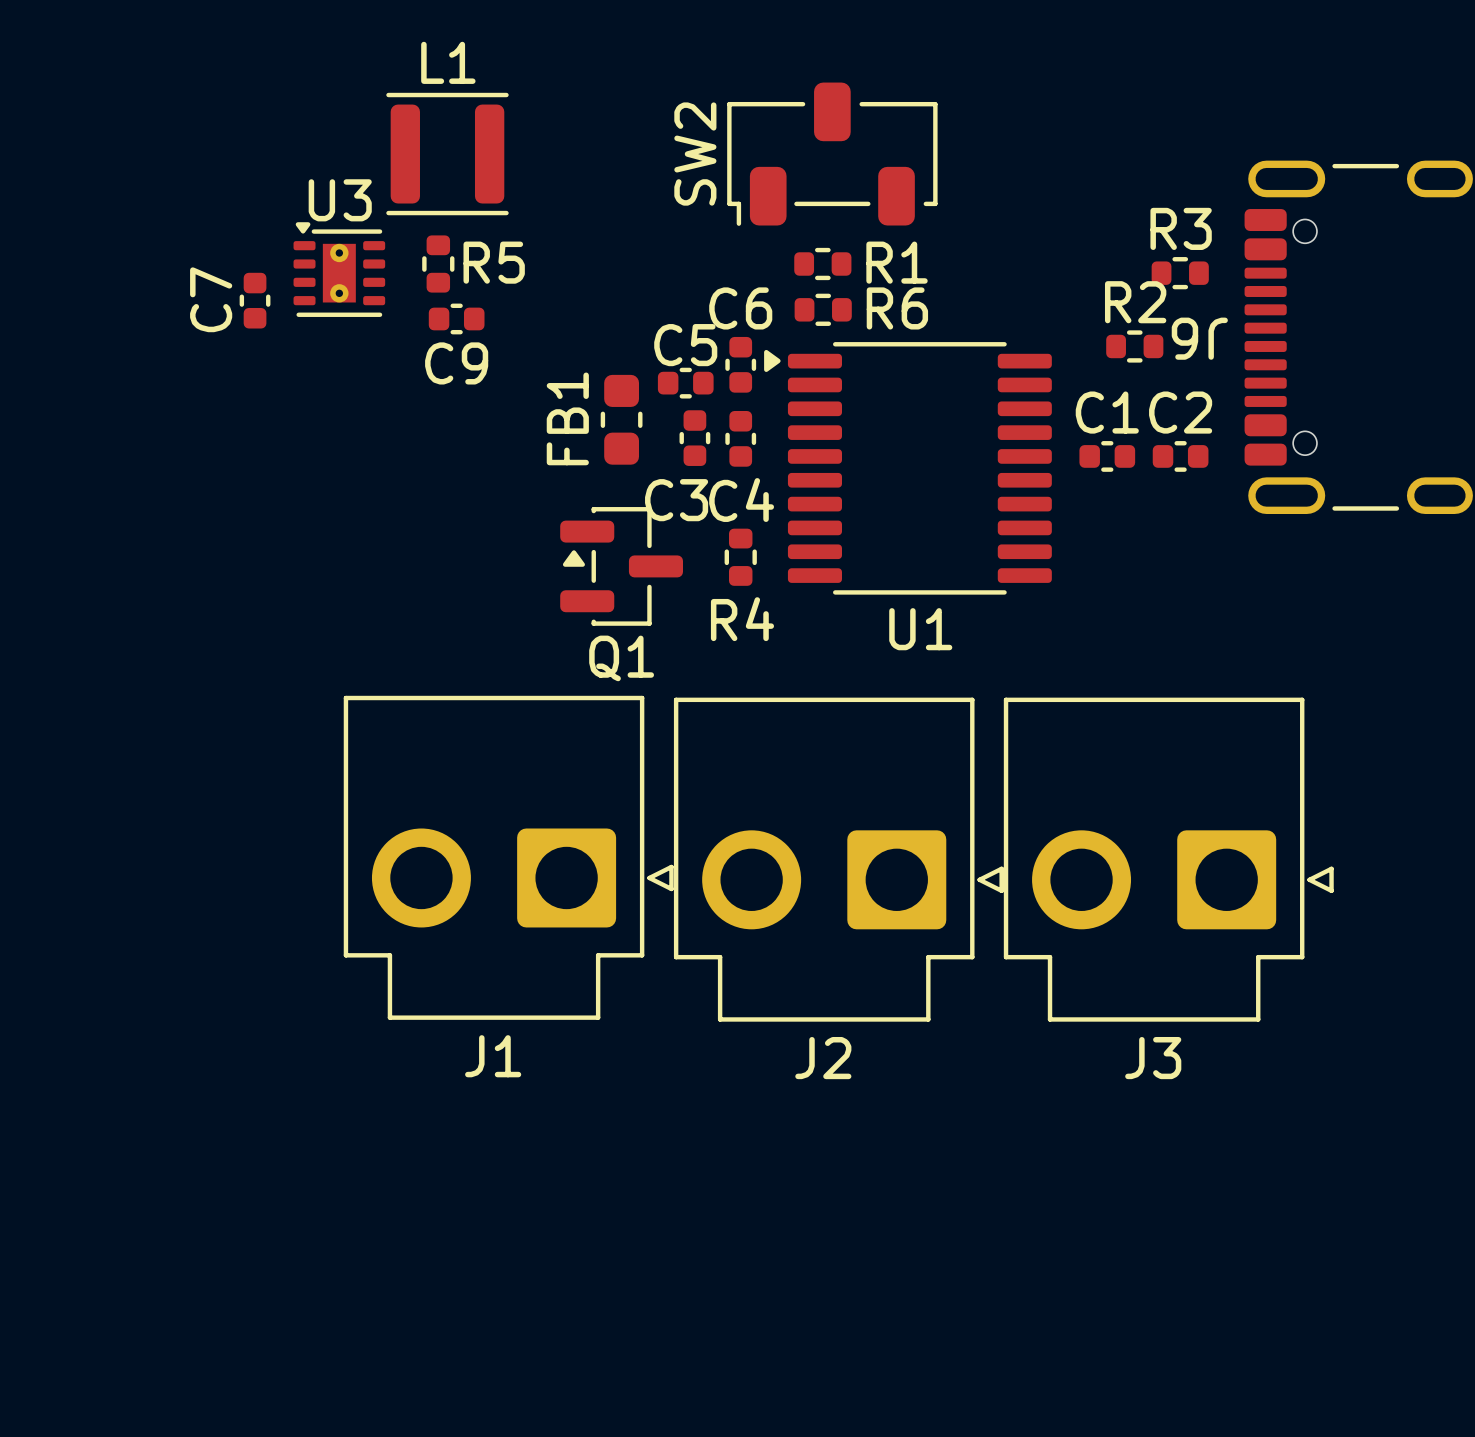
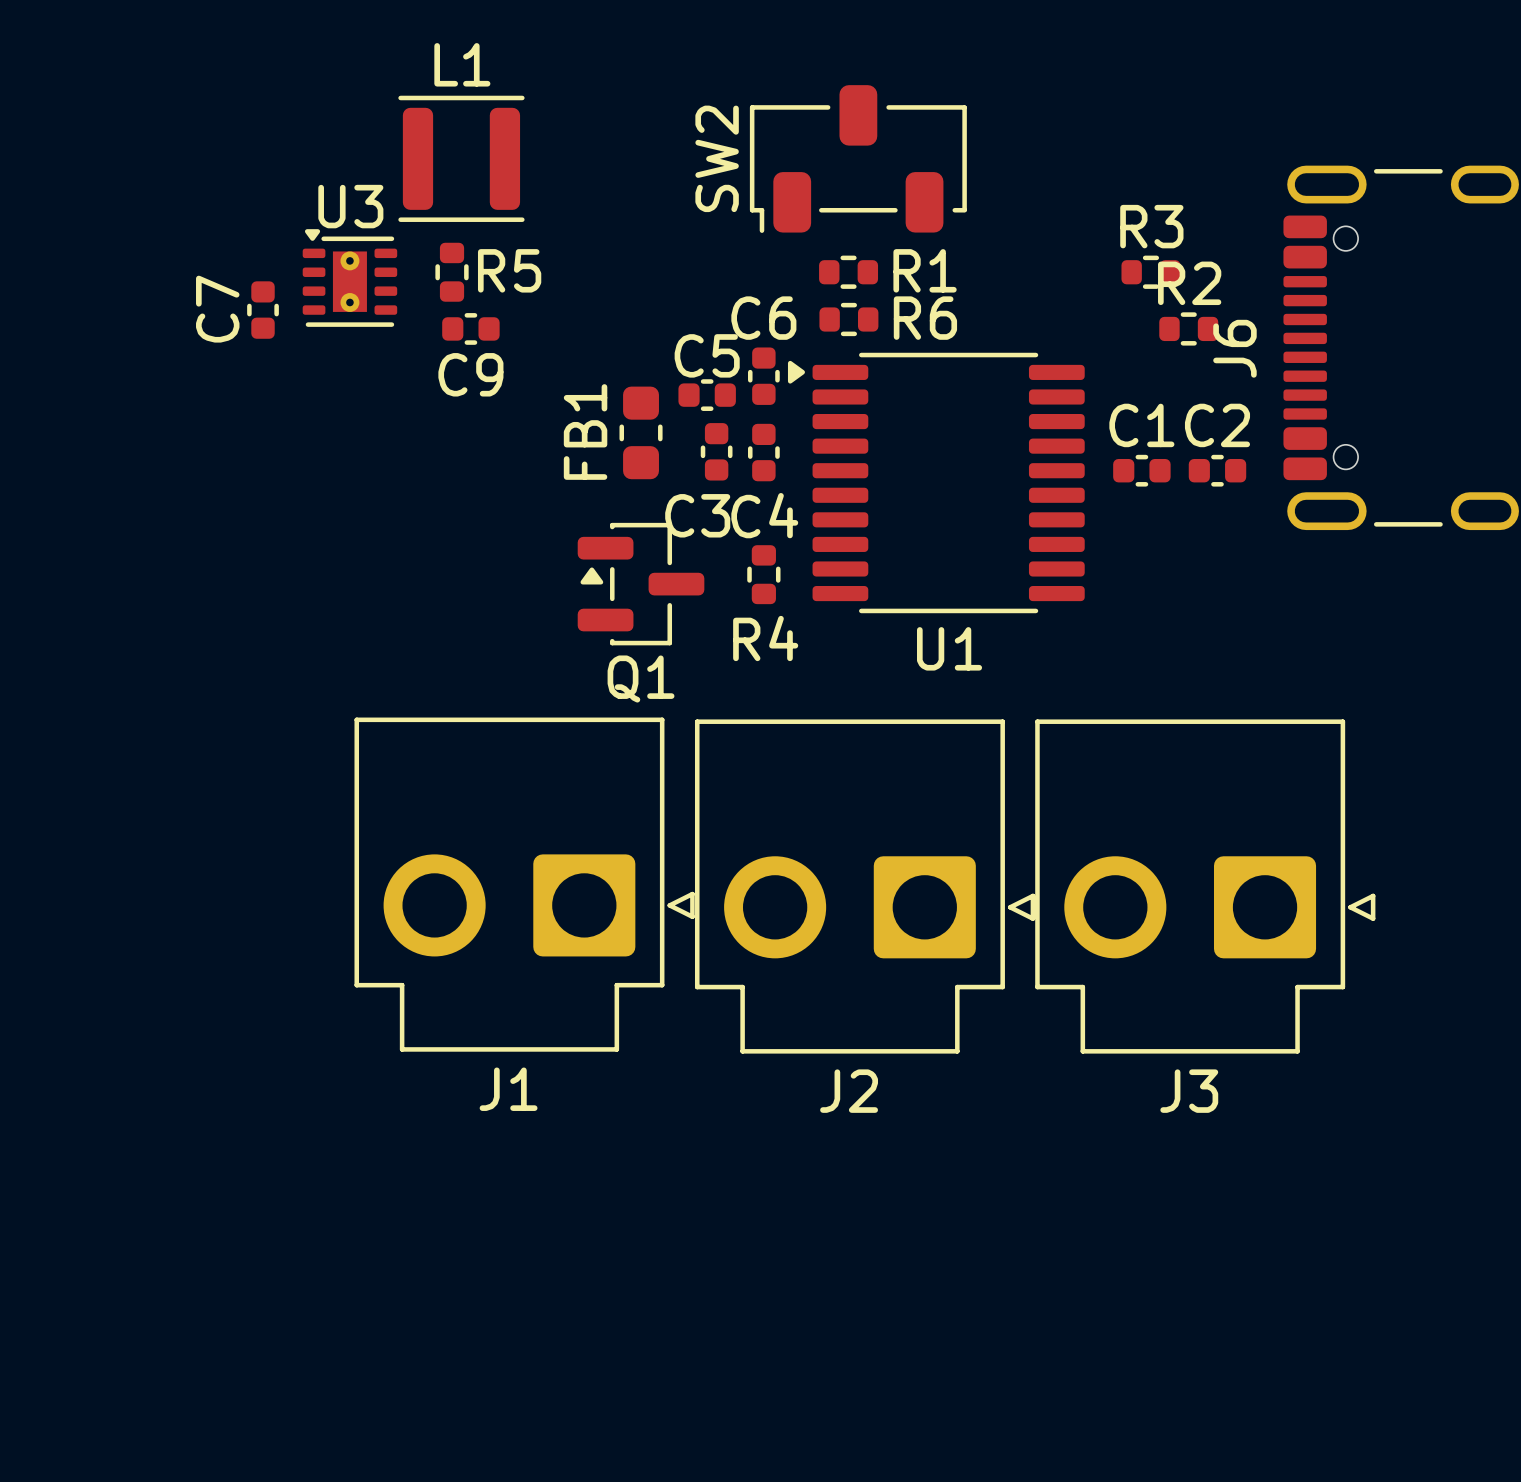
R3 position: (1180, 273) -> (1150, 272)
J6 name rotation: 0° (1199, 338) -> 90° clockwise (1234, 348)
R2 position: (1134, 346) -> (1188, 328)

